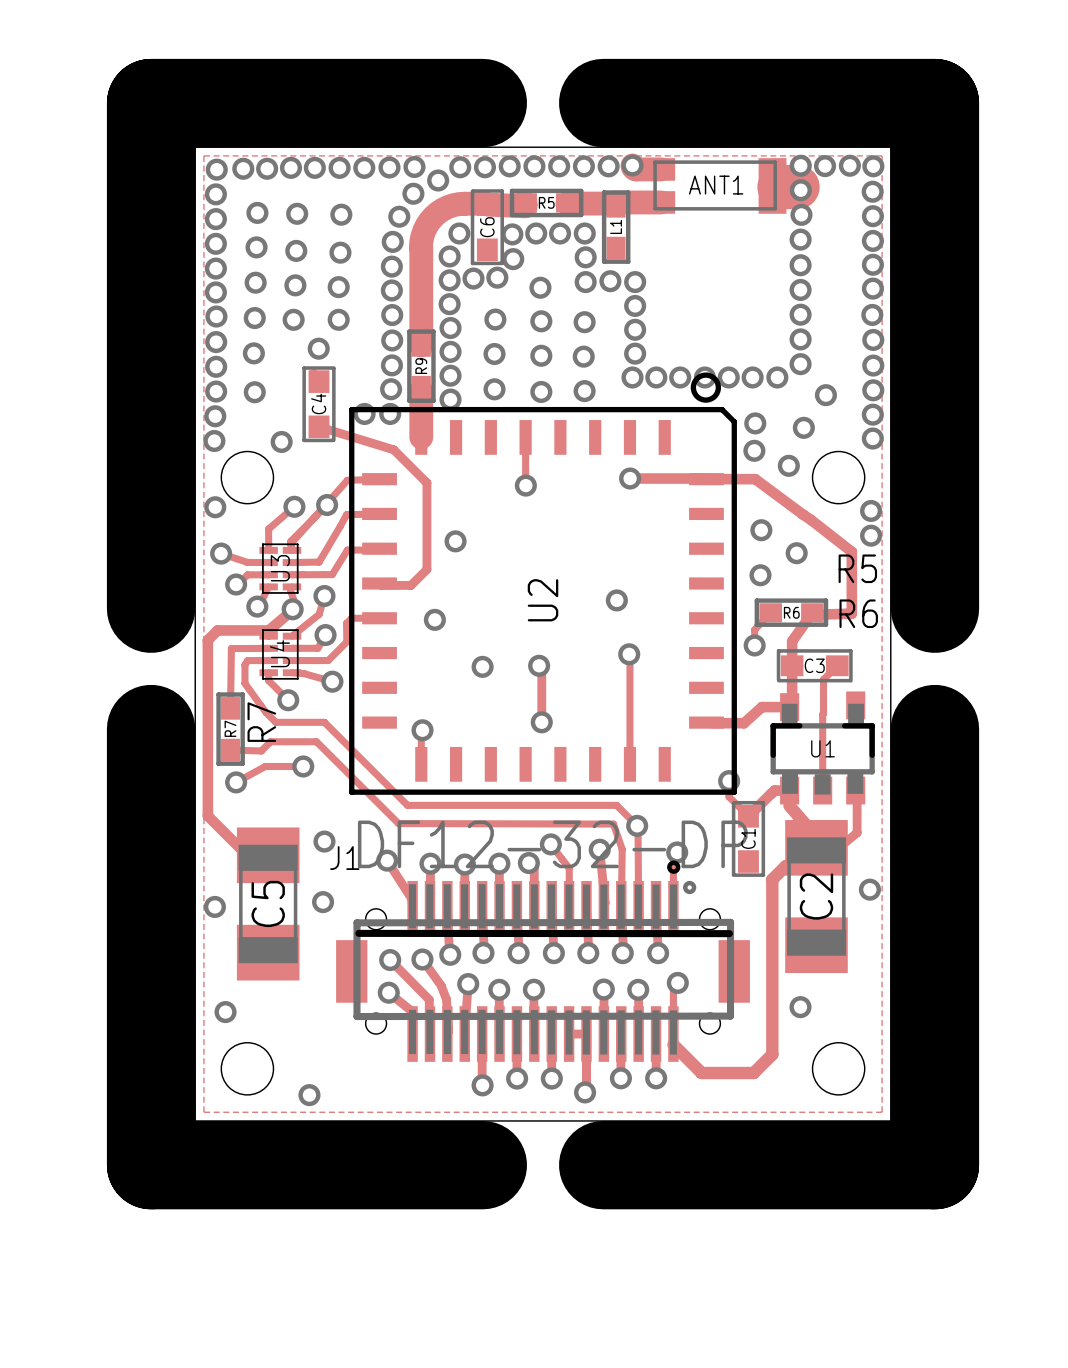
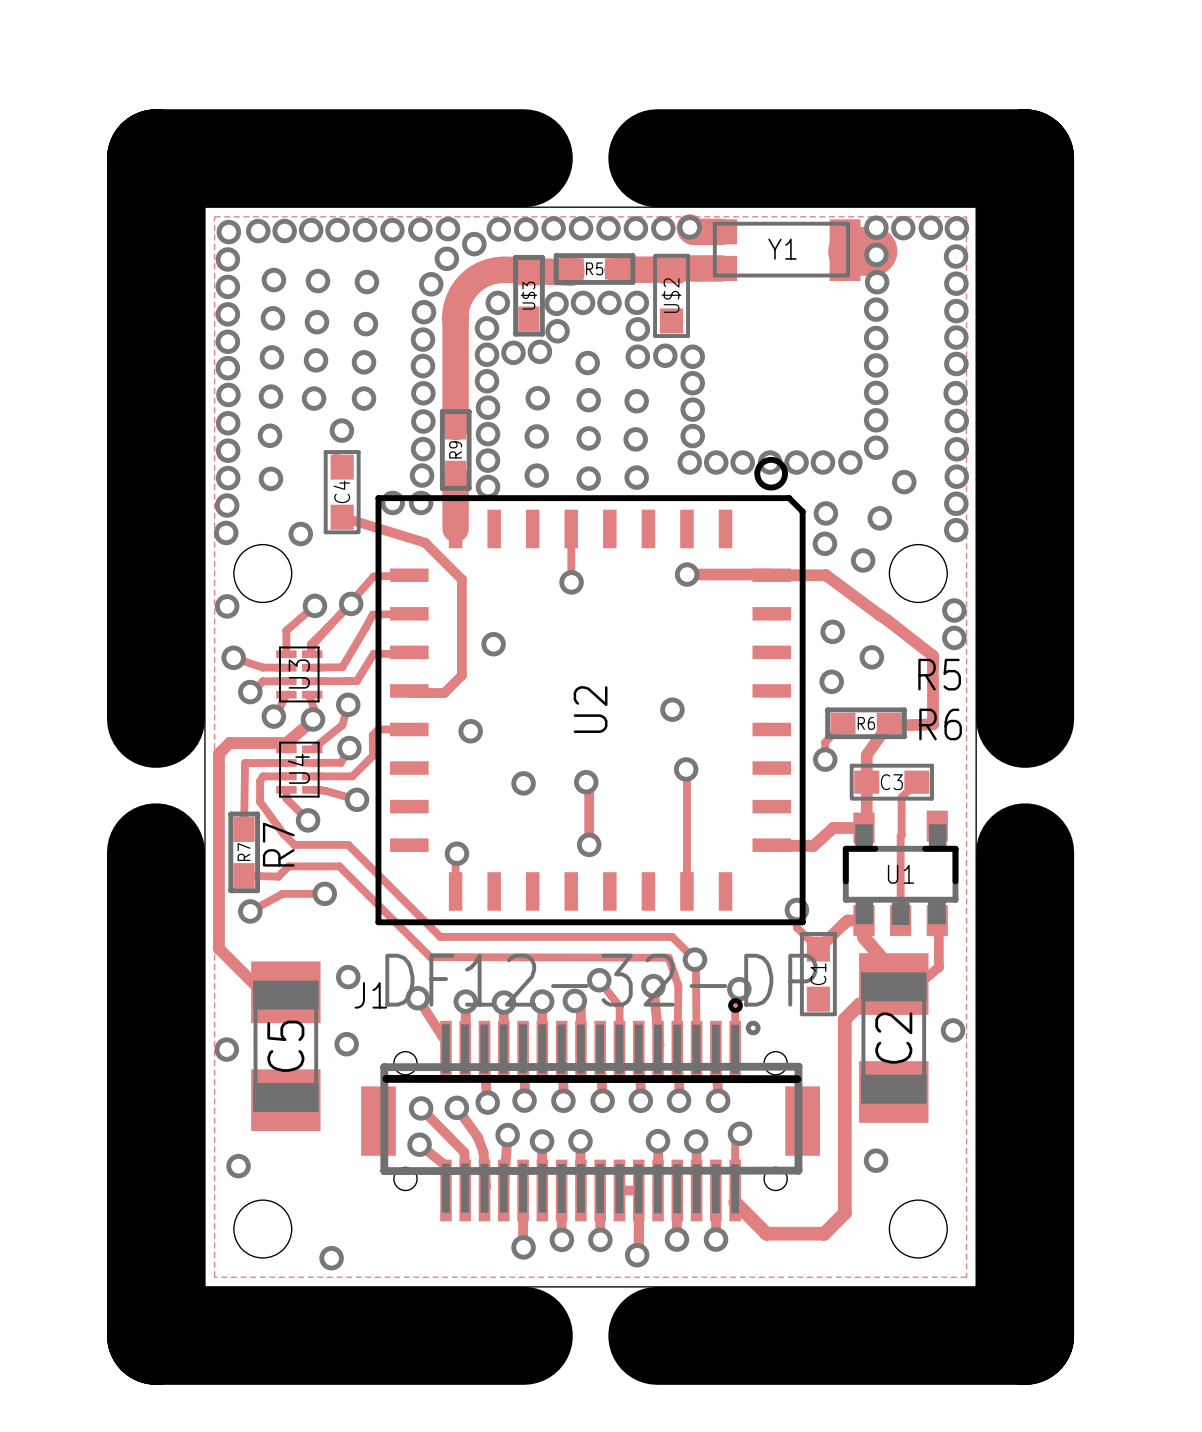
ANT1 name: ANT1 (716, 185) -> Y1 (782, 249)
C6: (487, 227) -> none
U$3: none -> (529, 295)
L1: (616, 227) -> none
U$2: none -> (671, 295)

